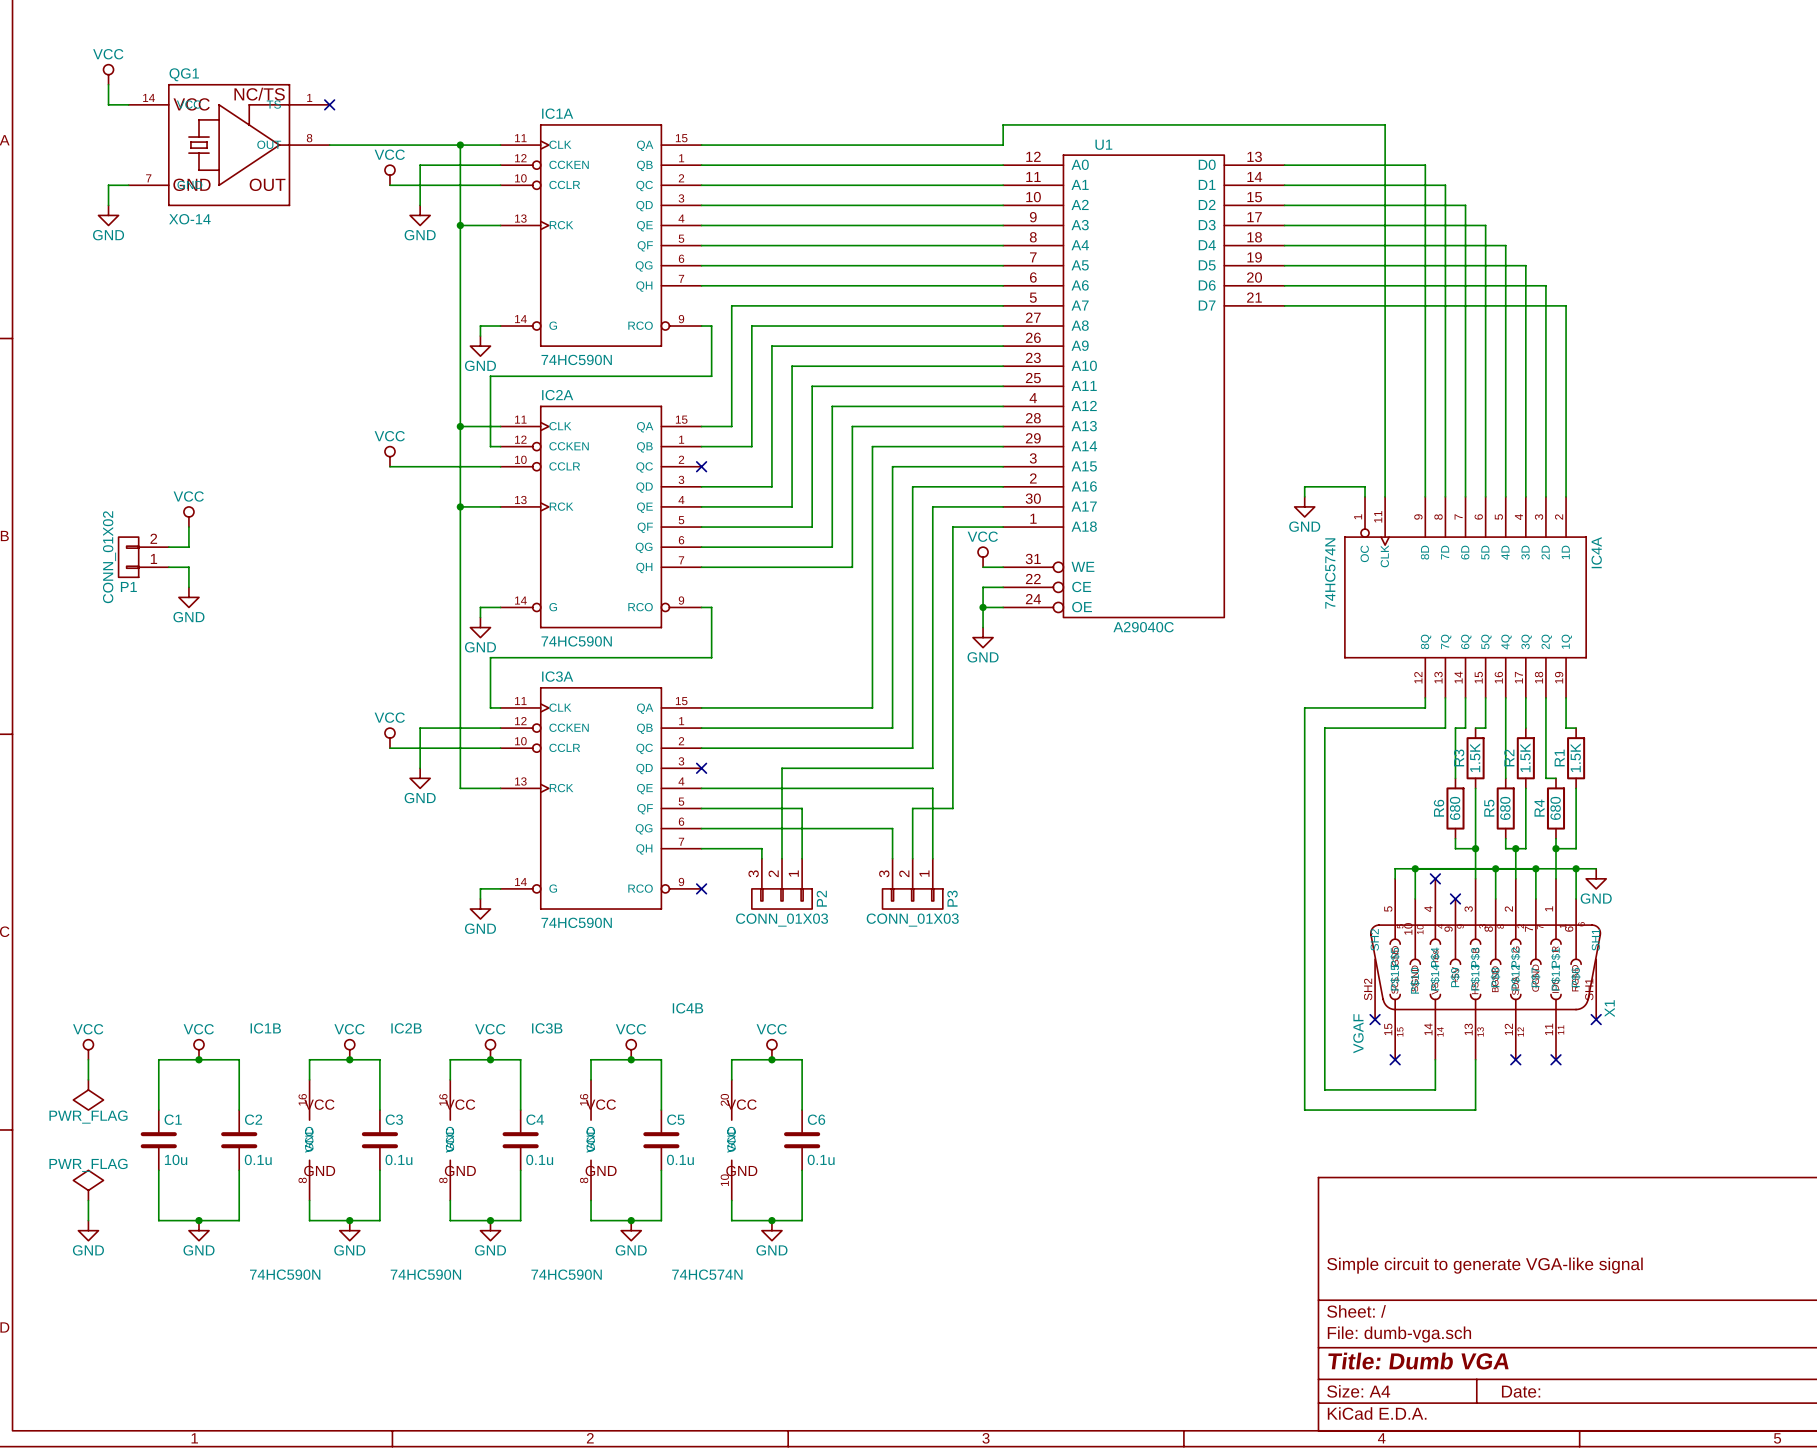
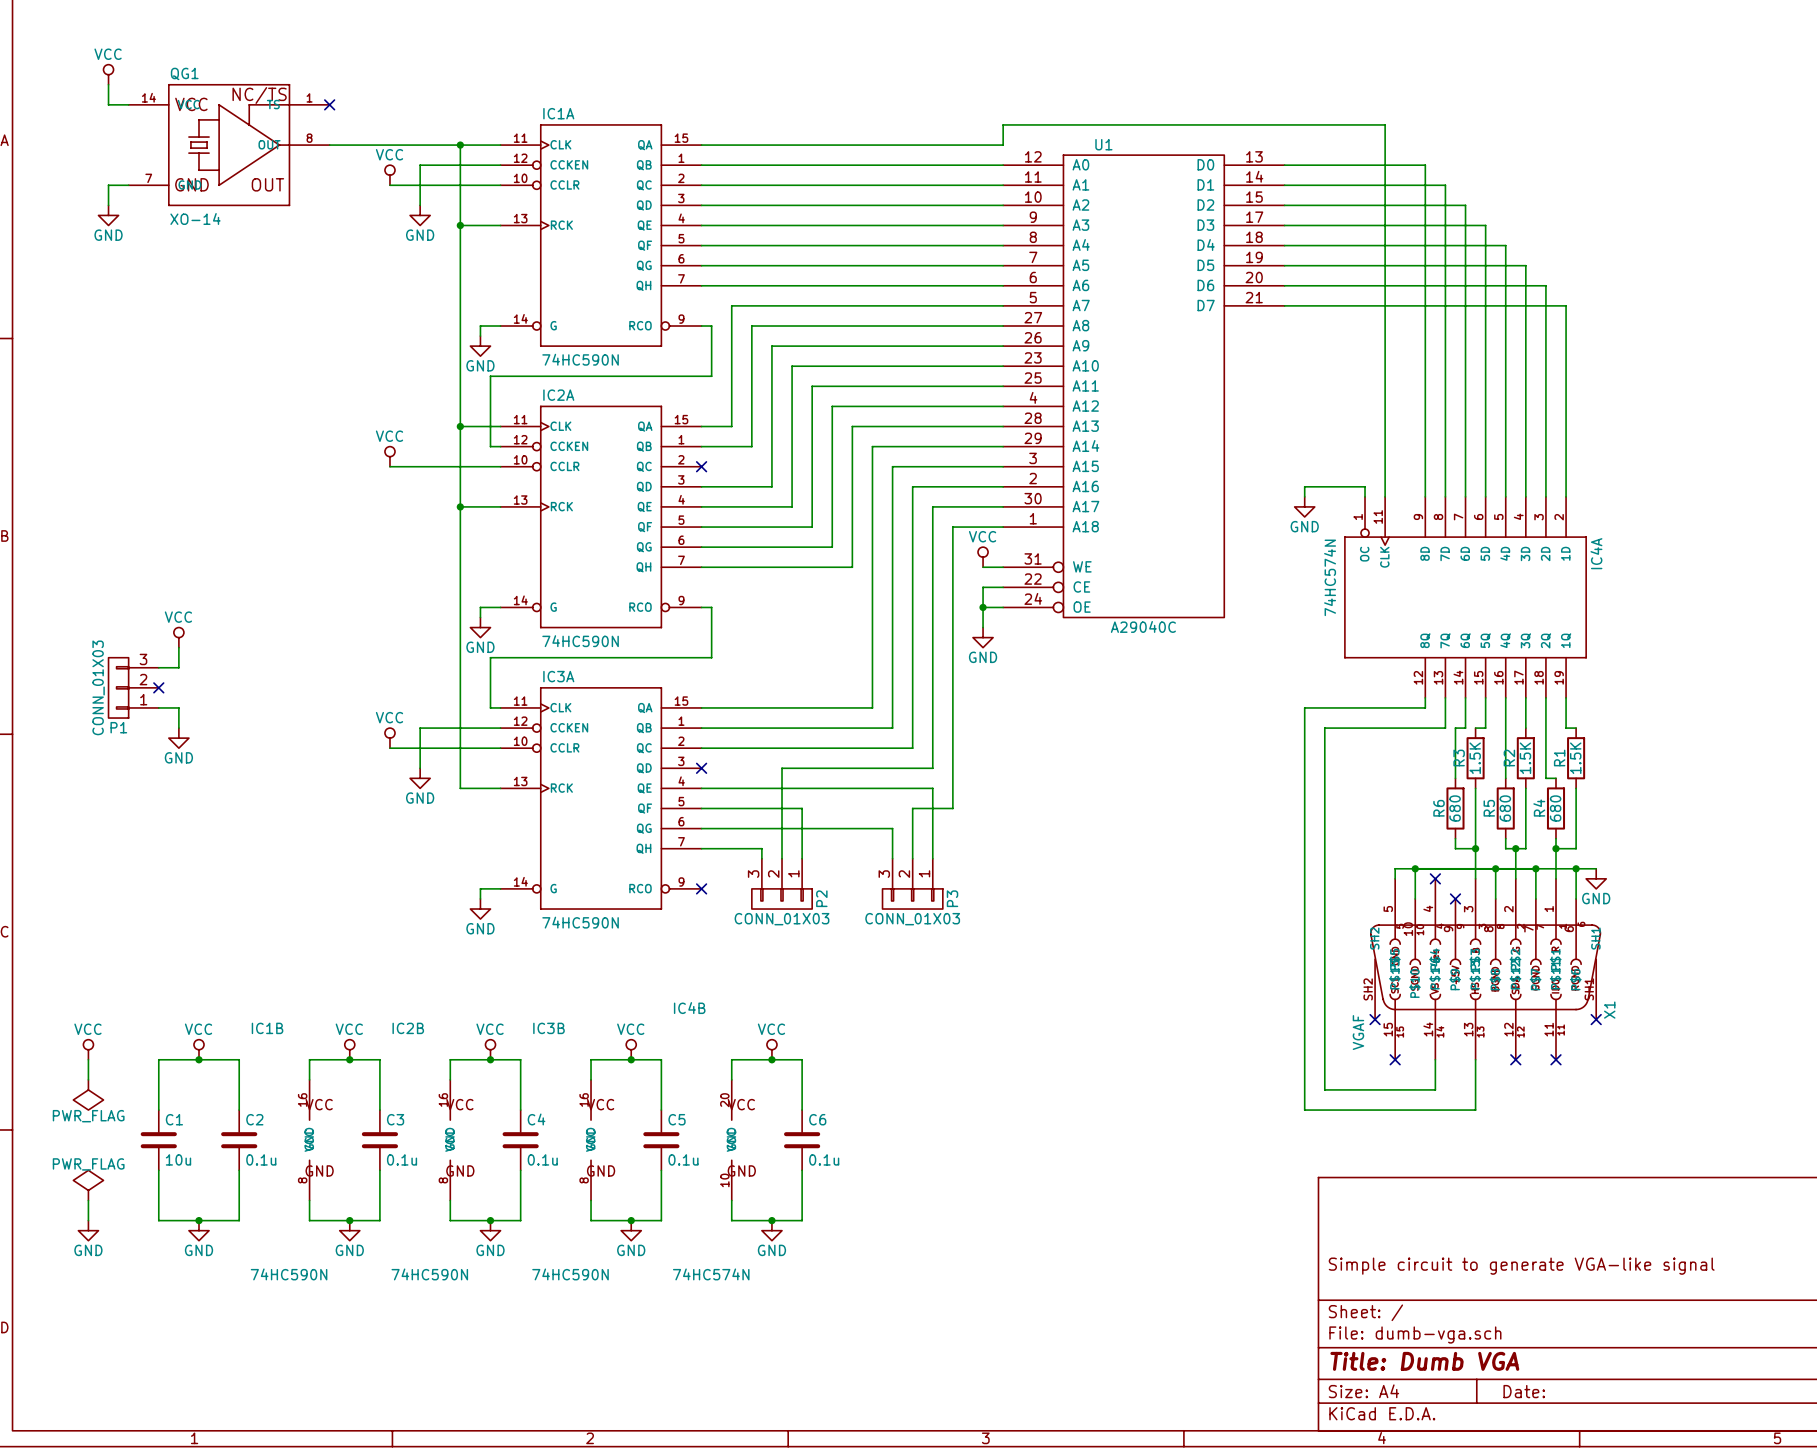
power symbol position: VCC (188, 516) -> VCC (178, 637)
wire: (188, 527) (188, 547) (168, 547) -> (178, 647) (178, 667) (158, 667)
P1 symbol: [118, 537, 169, 578] -> [108, 657, 159, 719]
P1 value: CONN_01X02 (109, 557) -> CONN_01X03 (98, 687)
wire: (168, 567) (188, 567) (188, 587) -> (158, 707) (178, 707) (178, 728)
power symbol position: GND (188, 597) -> GND (178, 738)
no-connect mark: none -> (158, 687)

